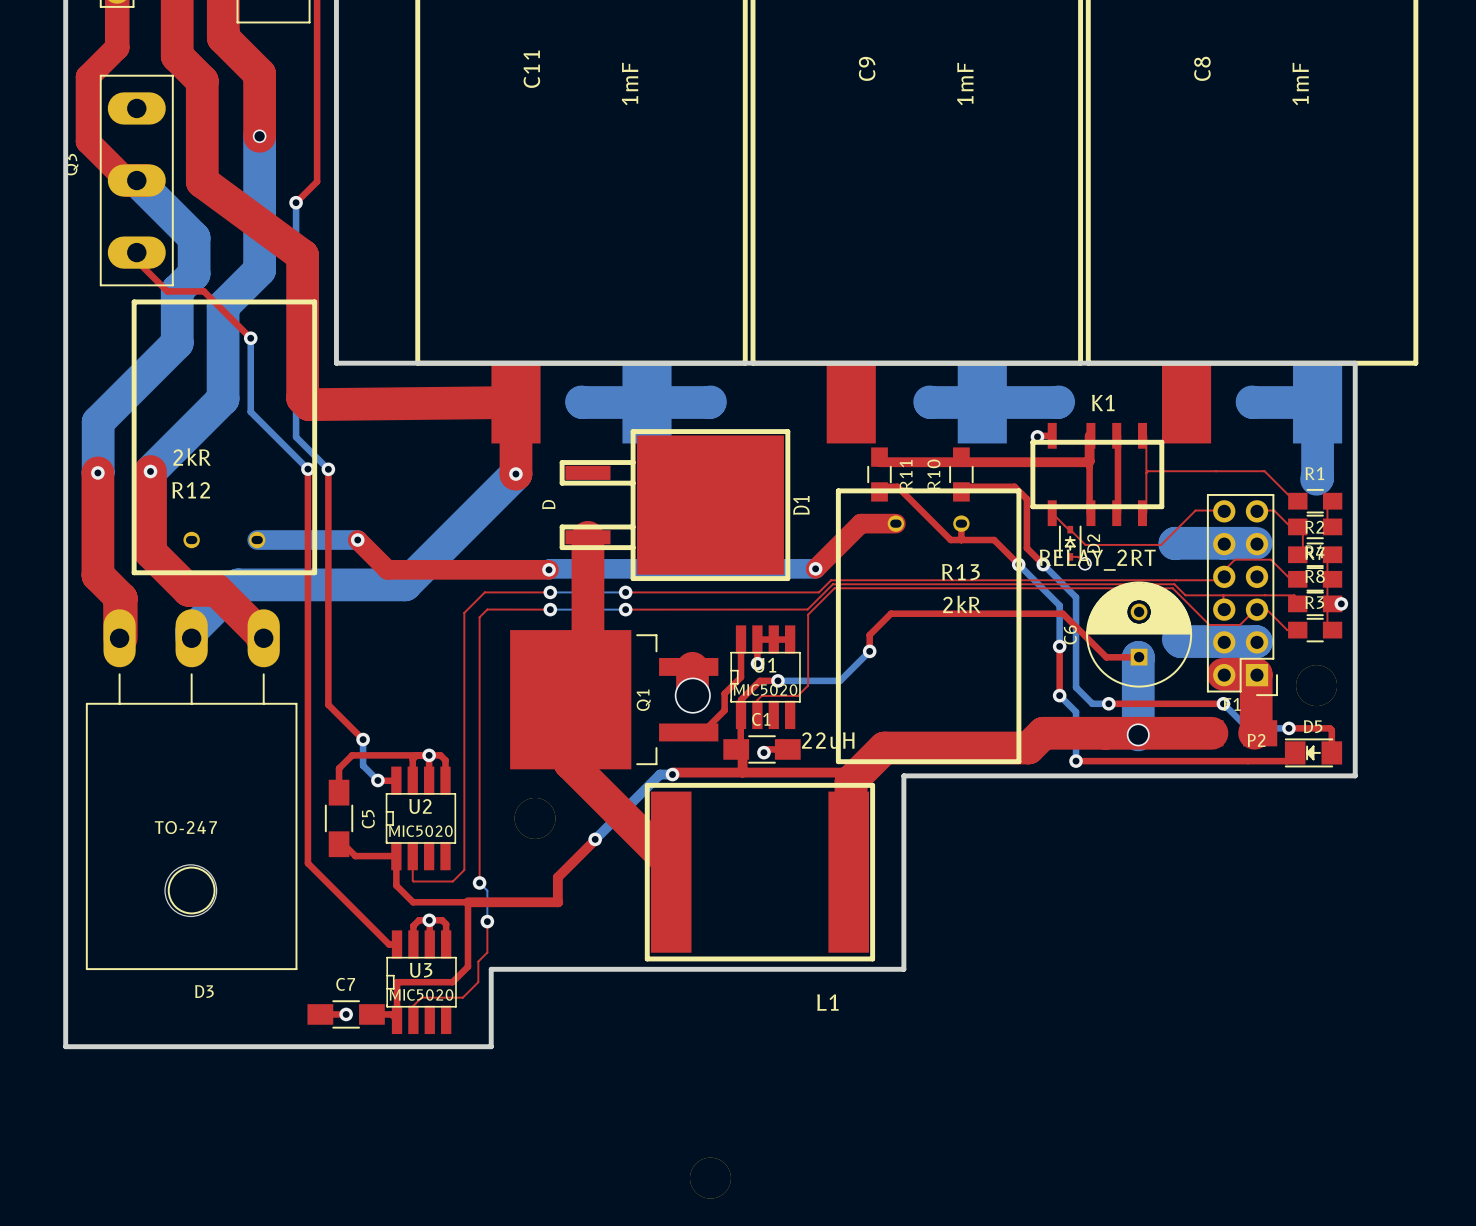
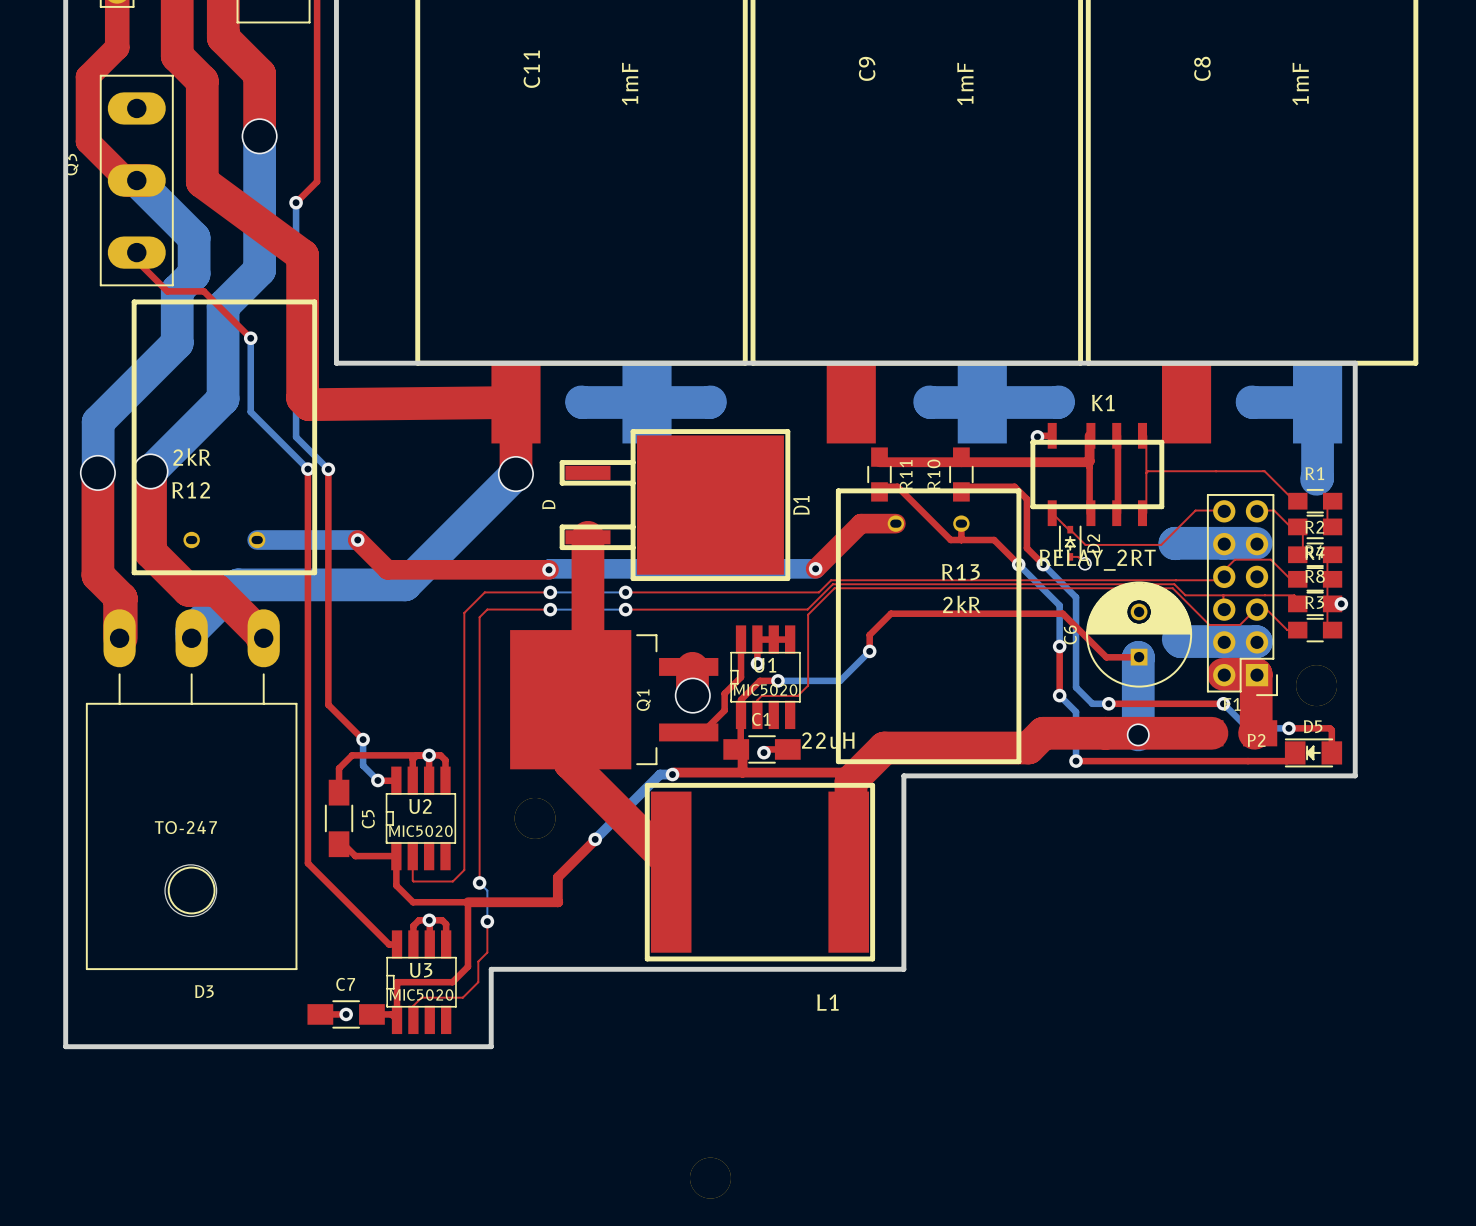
via size: [252, 129, 267, 144] -> [241, 118, 278, 155]
via size: [143, 464, 158, 479] -> [132, 453, 169, 490]
via size: [91, 466, 105, 480] -> [79, 454, 116, 491]
via size: [509, 467, 523, 481] -> [497, 456, 534, 493]

